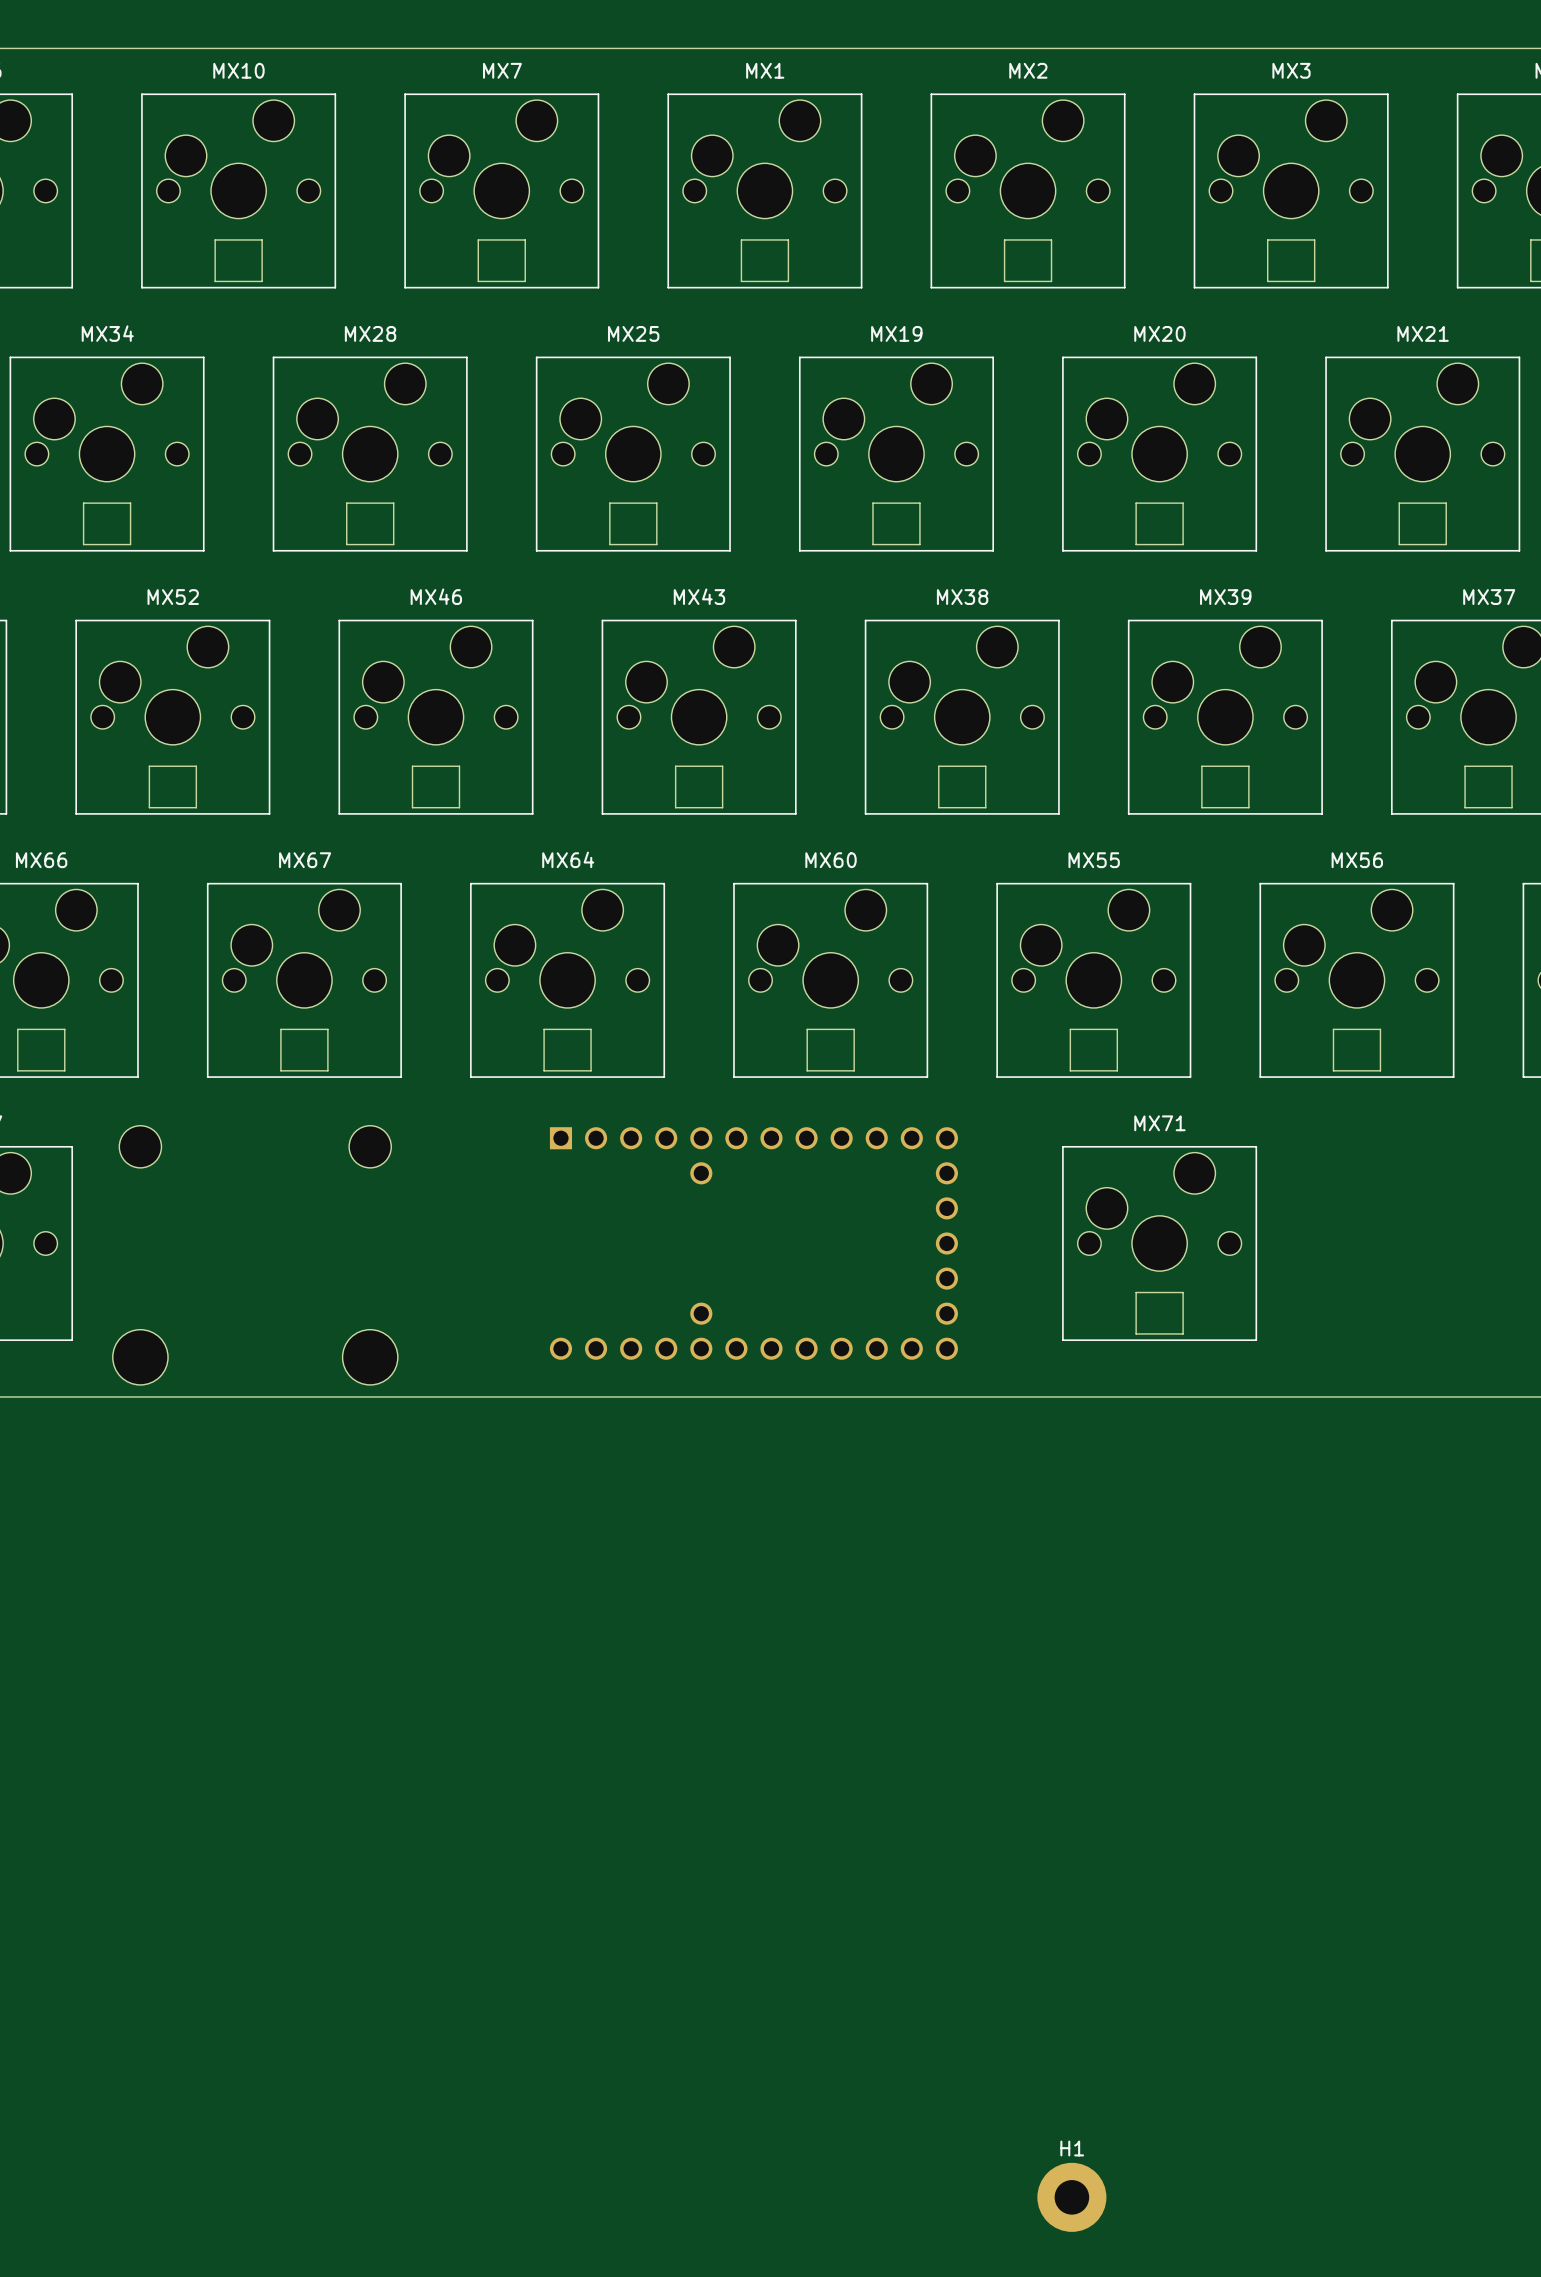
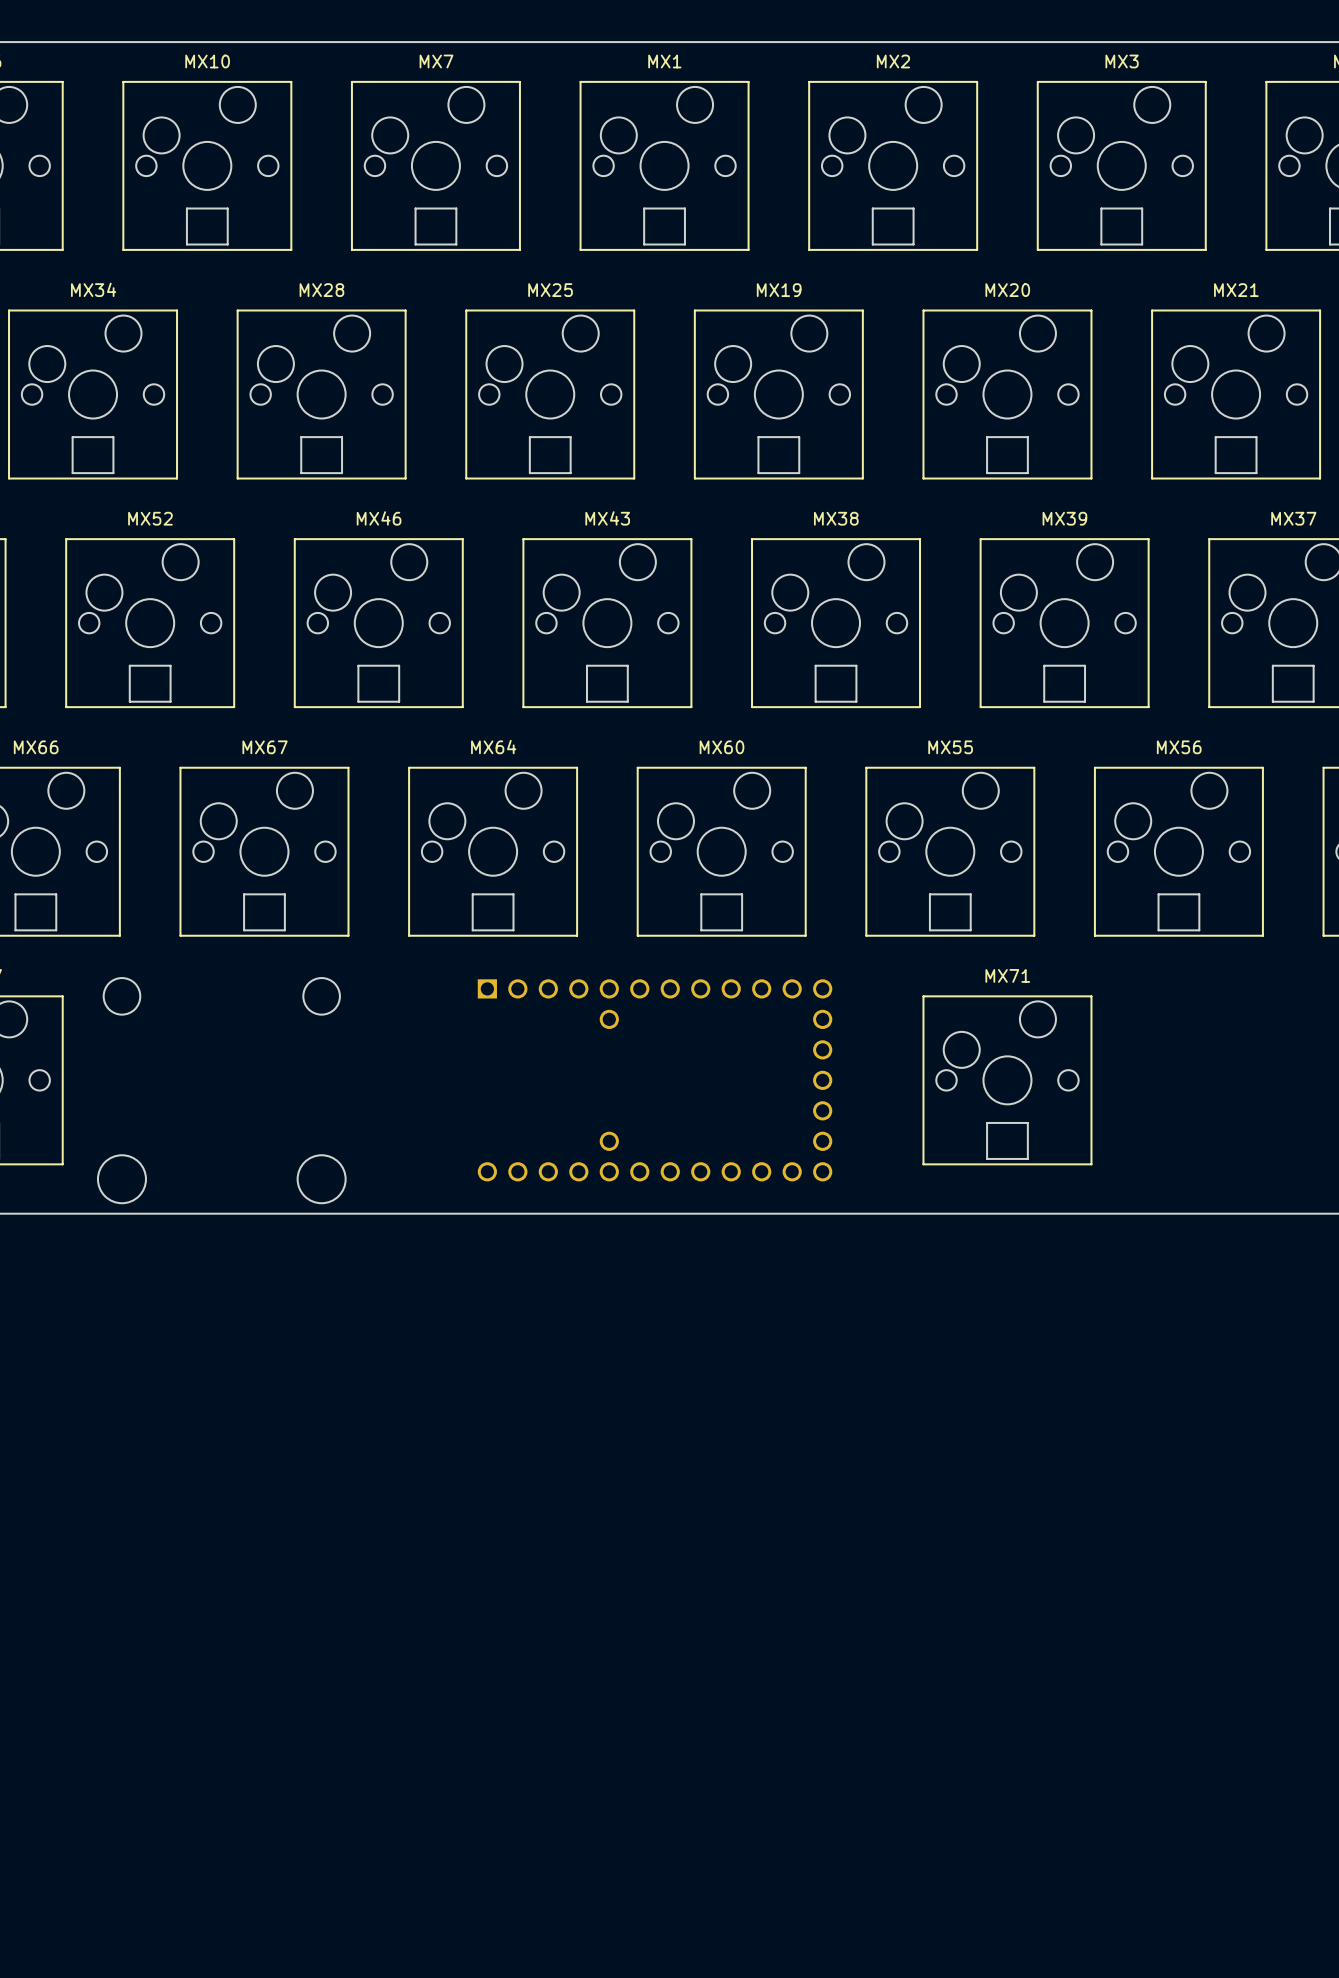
H1: (1071, 2197) -> none

